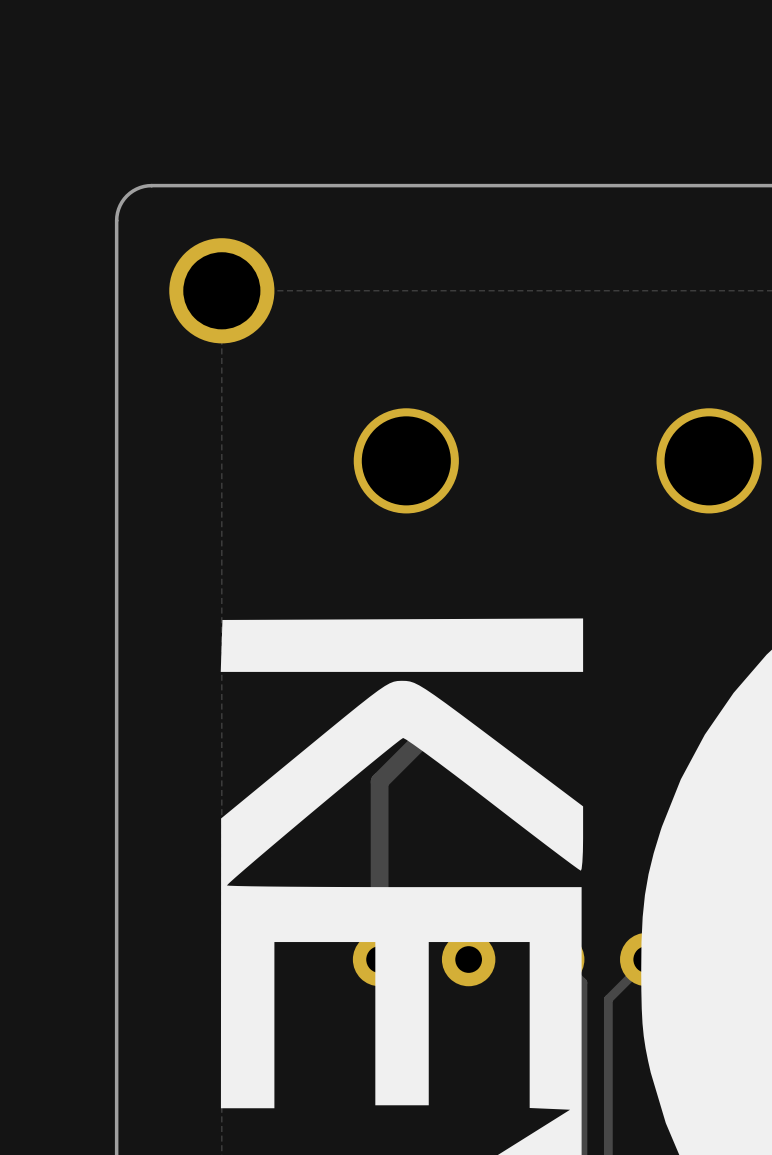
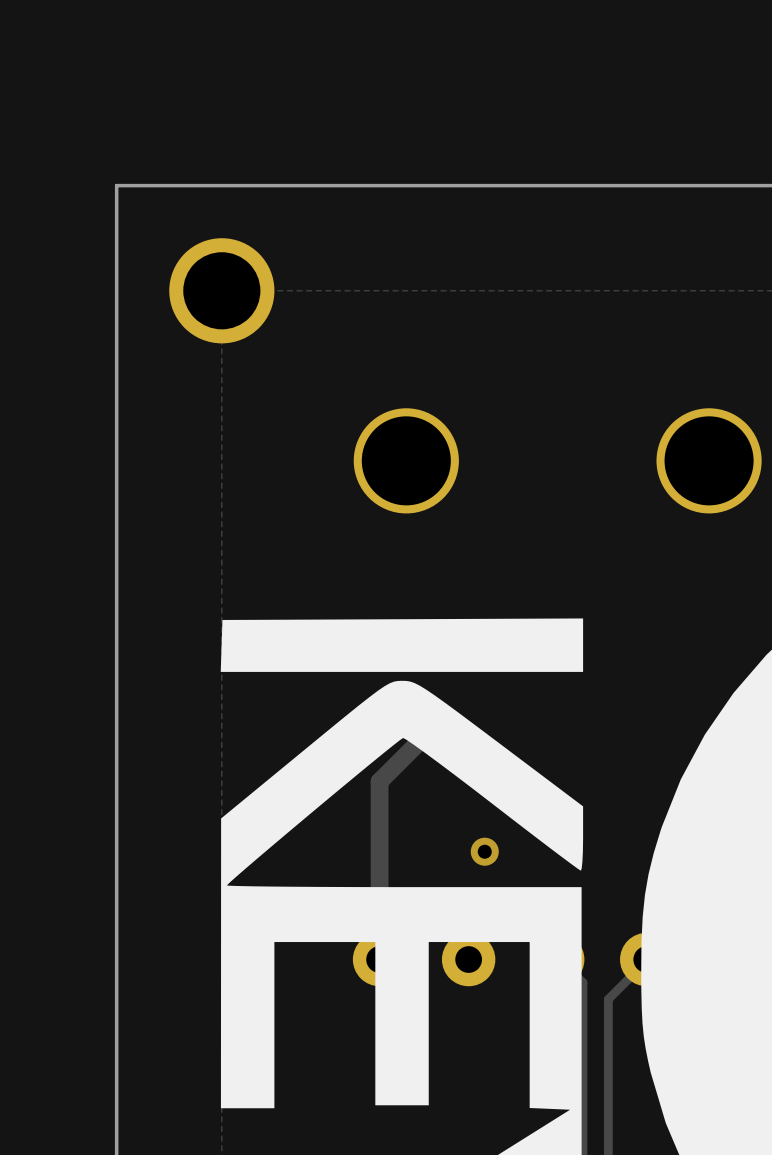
board edge: (151, 185) (136, 189) (126, 195) (120, 205) (116, 220) -> (151, 185) (116, 185) (116, 220)
via: none -> (484, 851)

